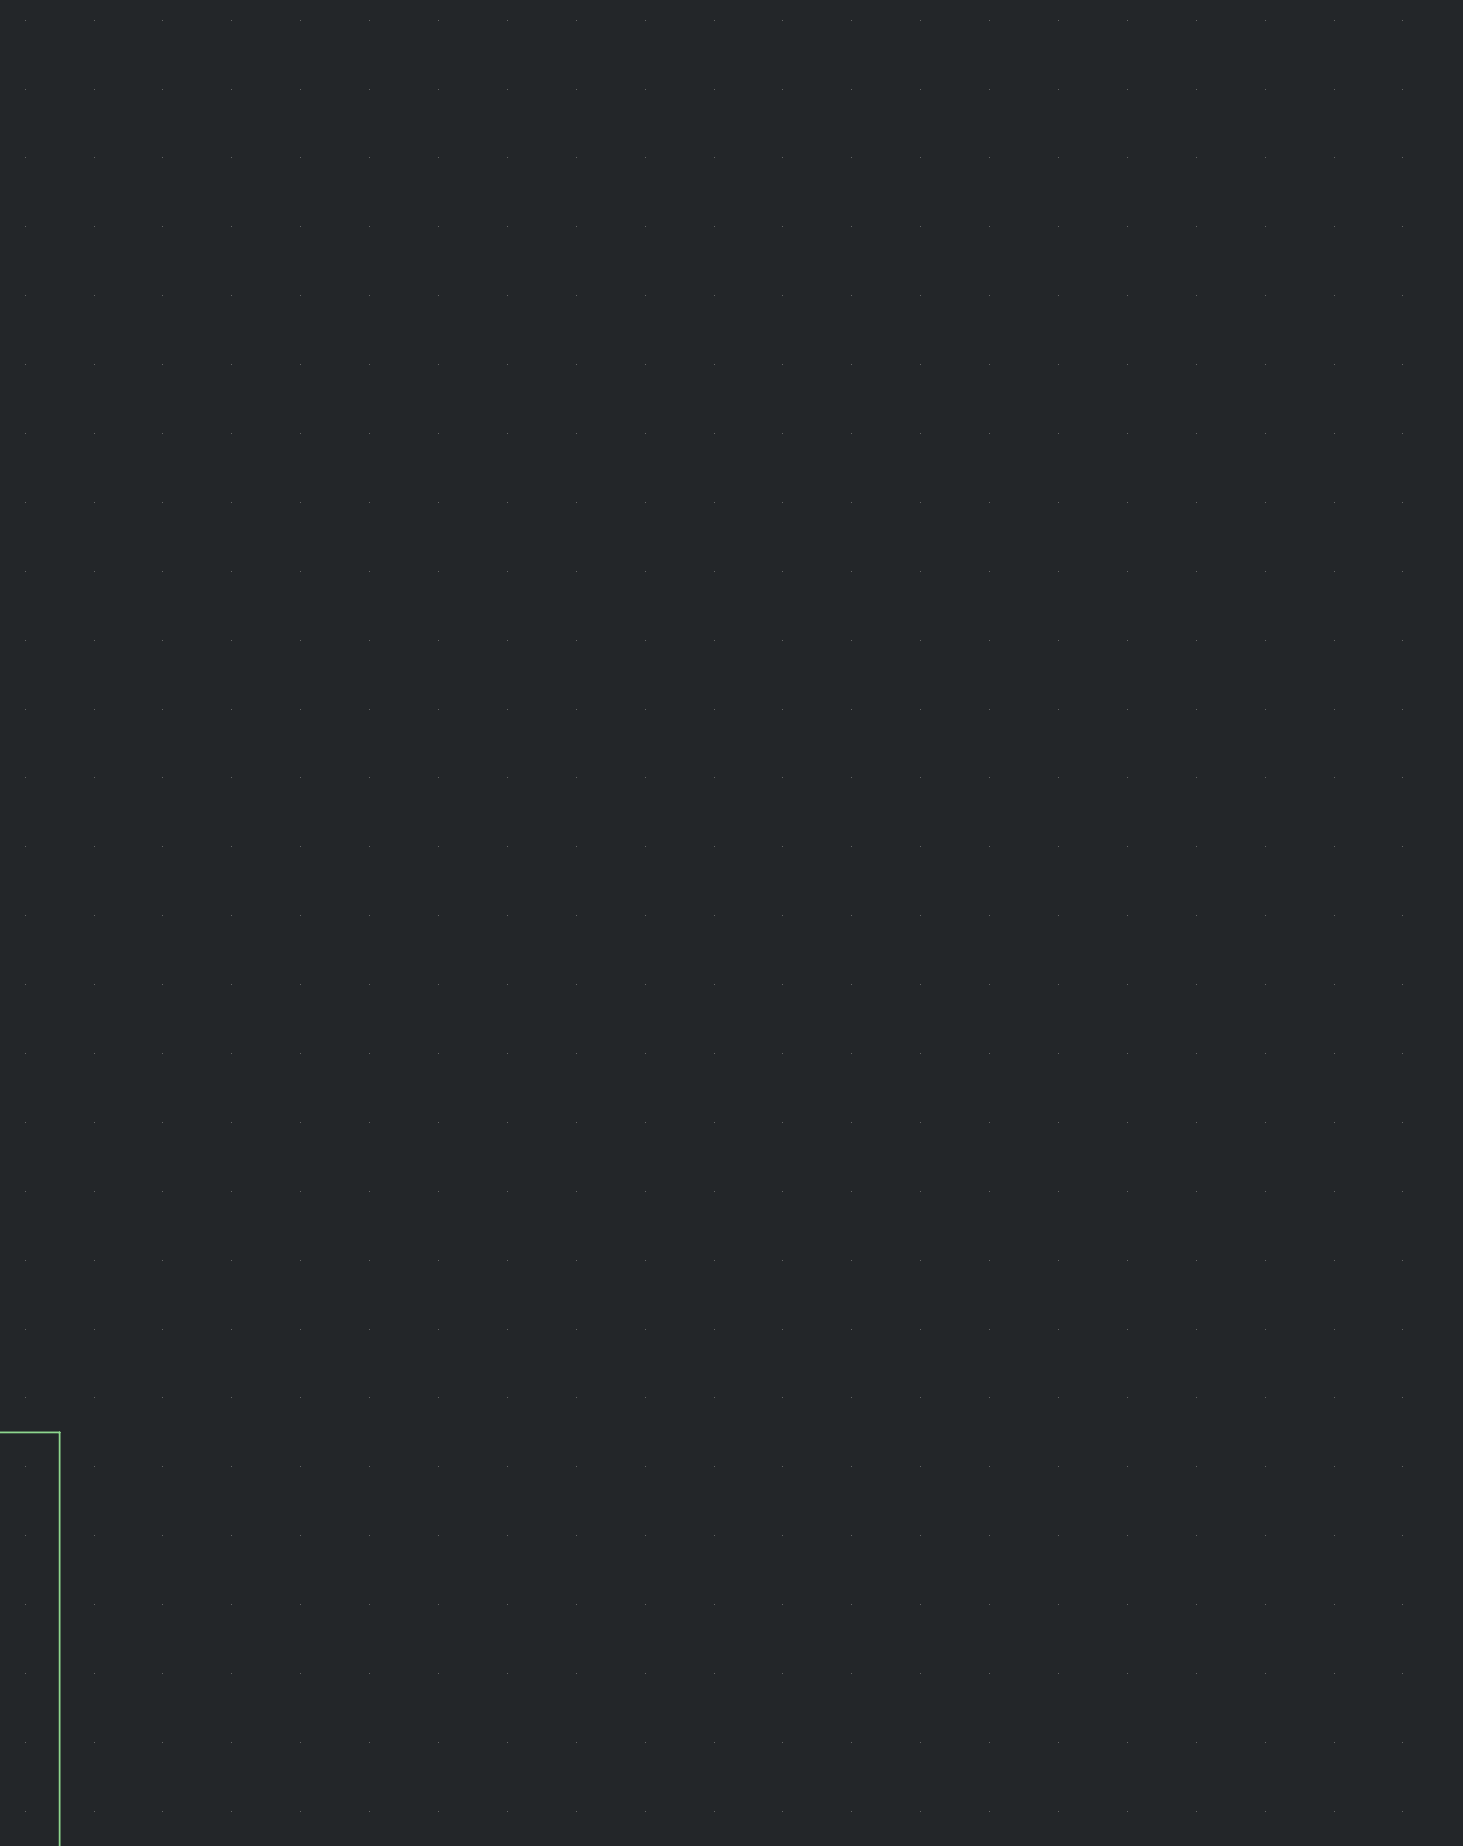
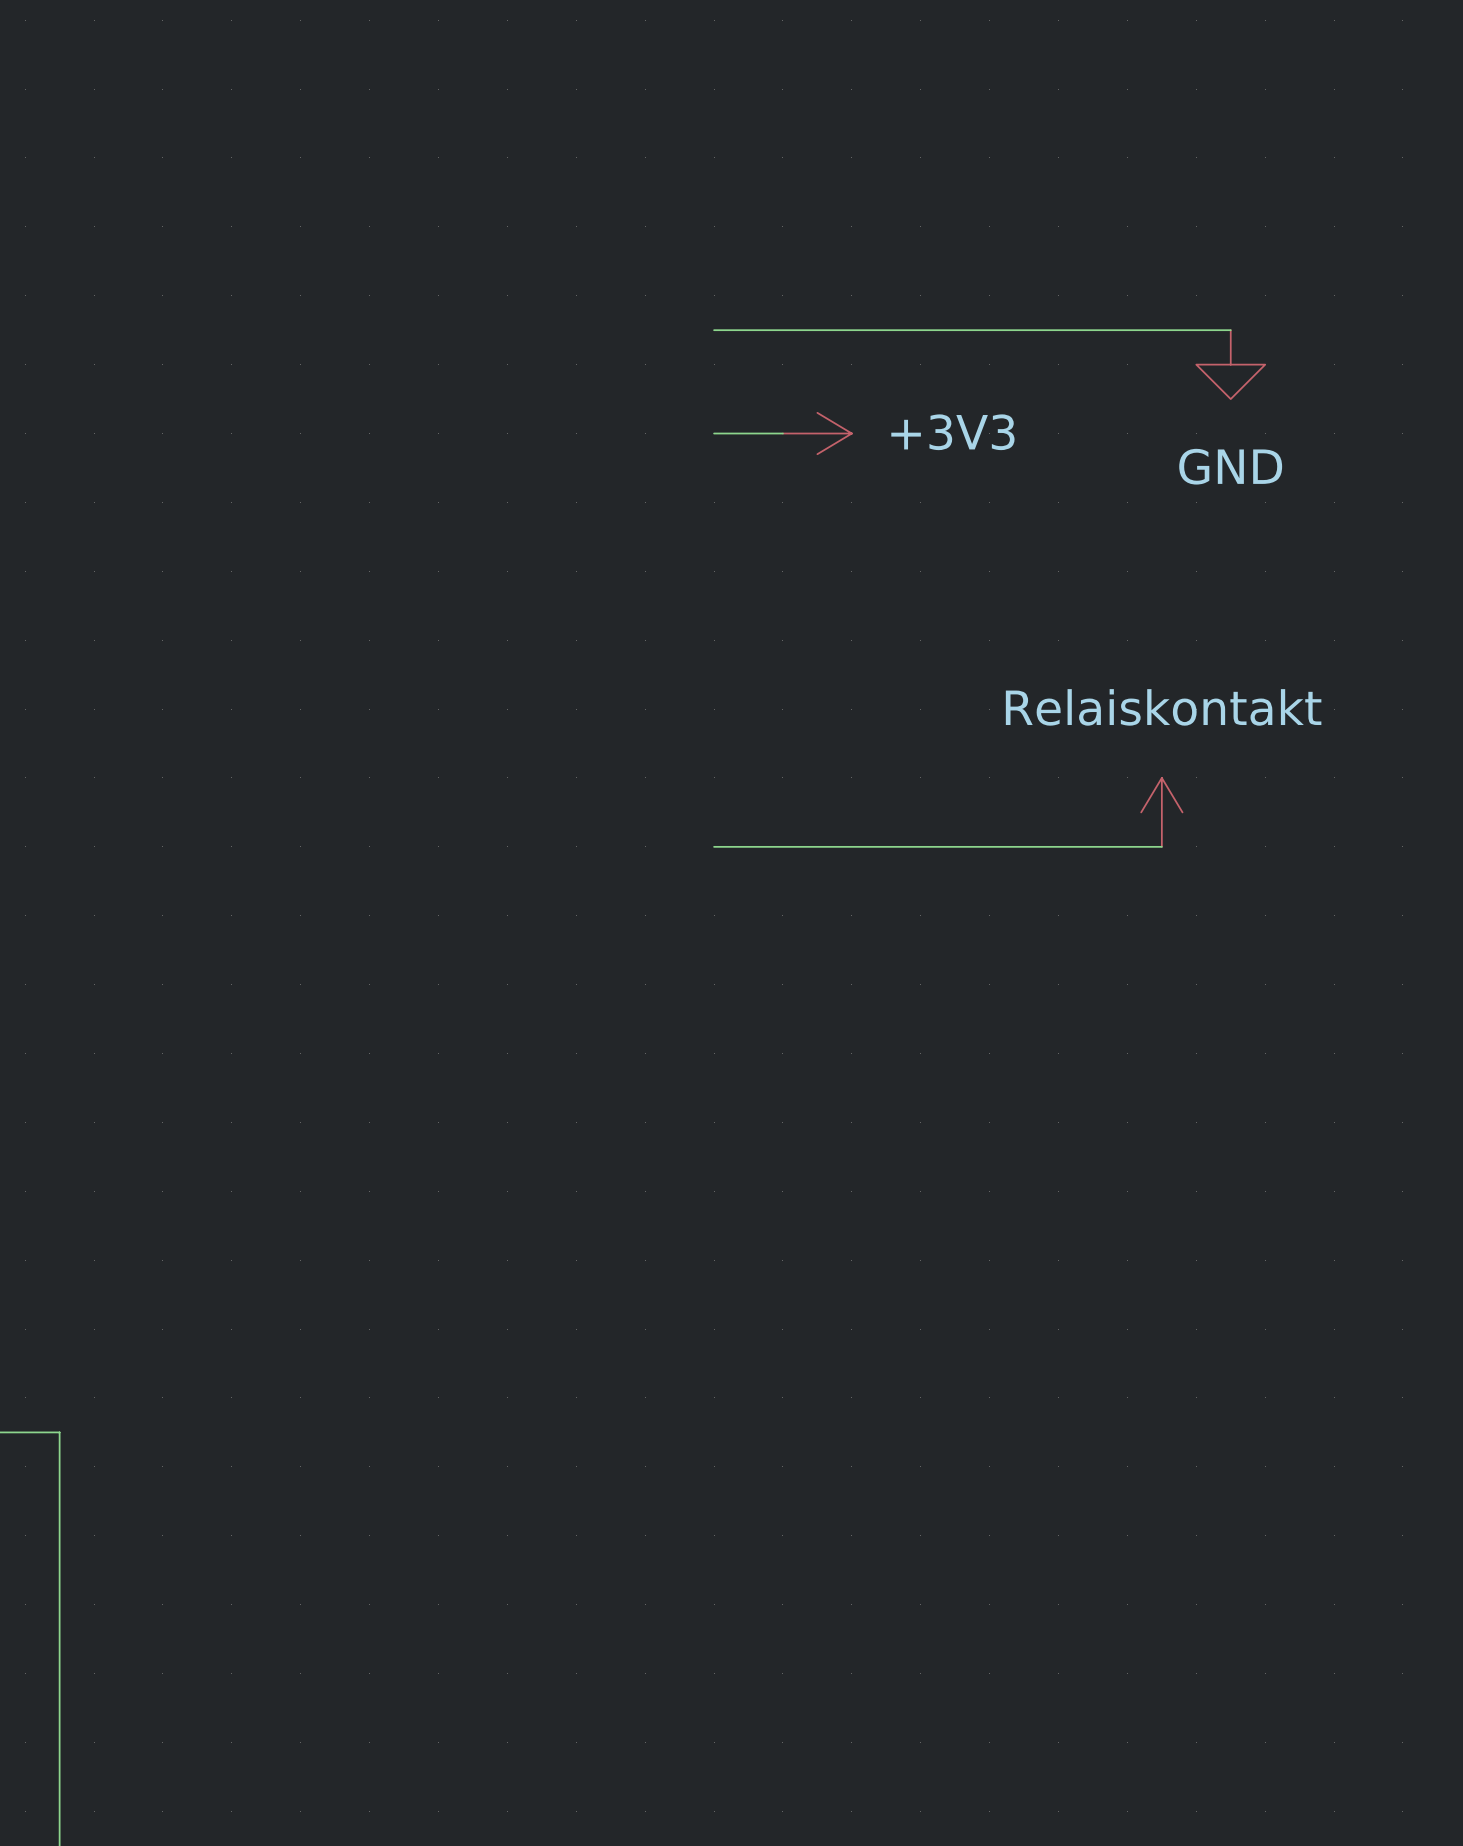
wire: none -> (714, 330) (1230, 330)
power symbol: none -> GND (1230, 364)
wire: none -> (714, 433) (782, 433)
power symbol: none -> +3V3 (817, 433)
power symbol: none -> Relaiskontakt (1161, 812)
wire: none -> (714, 846) (1161, 846)

